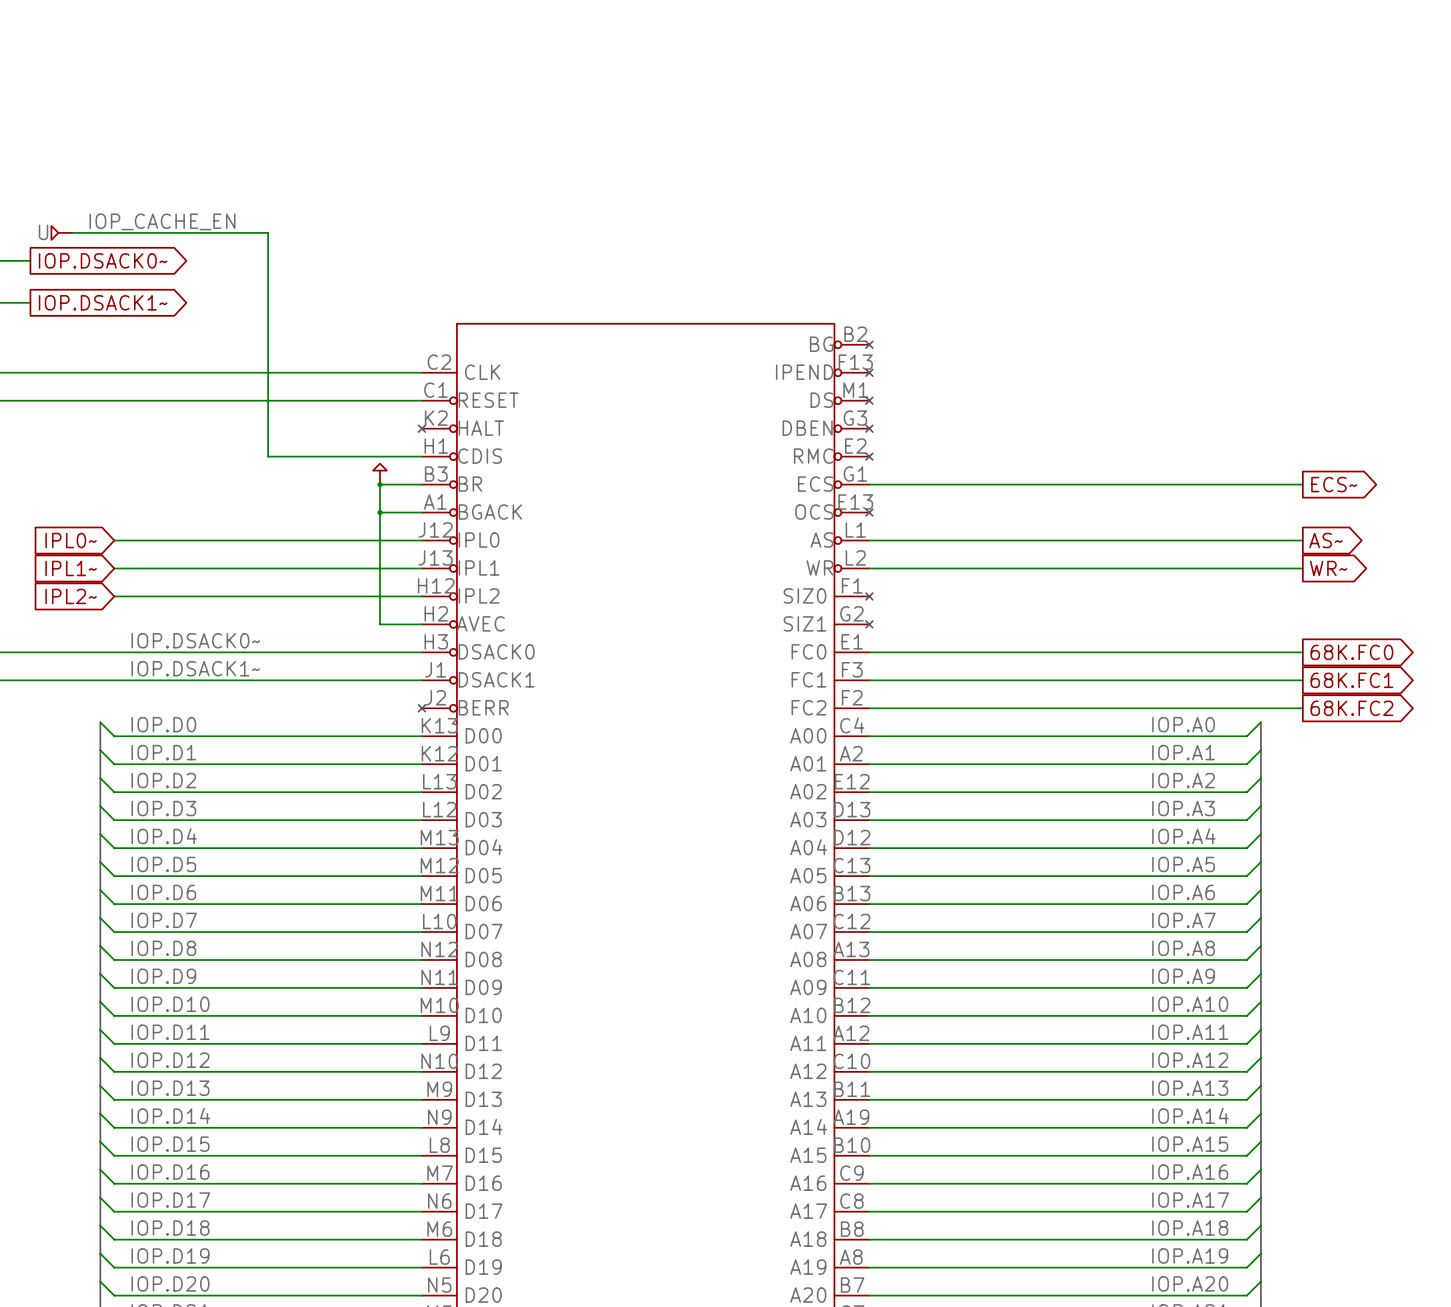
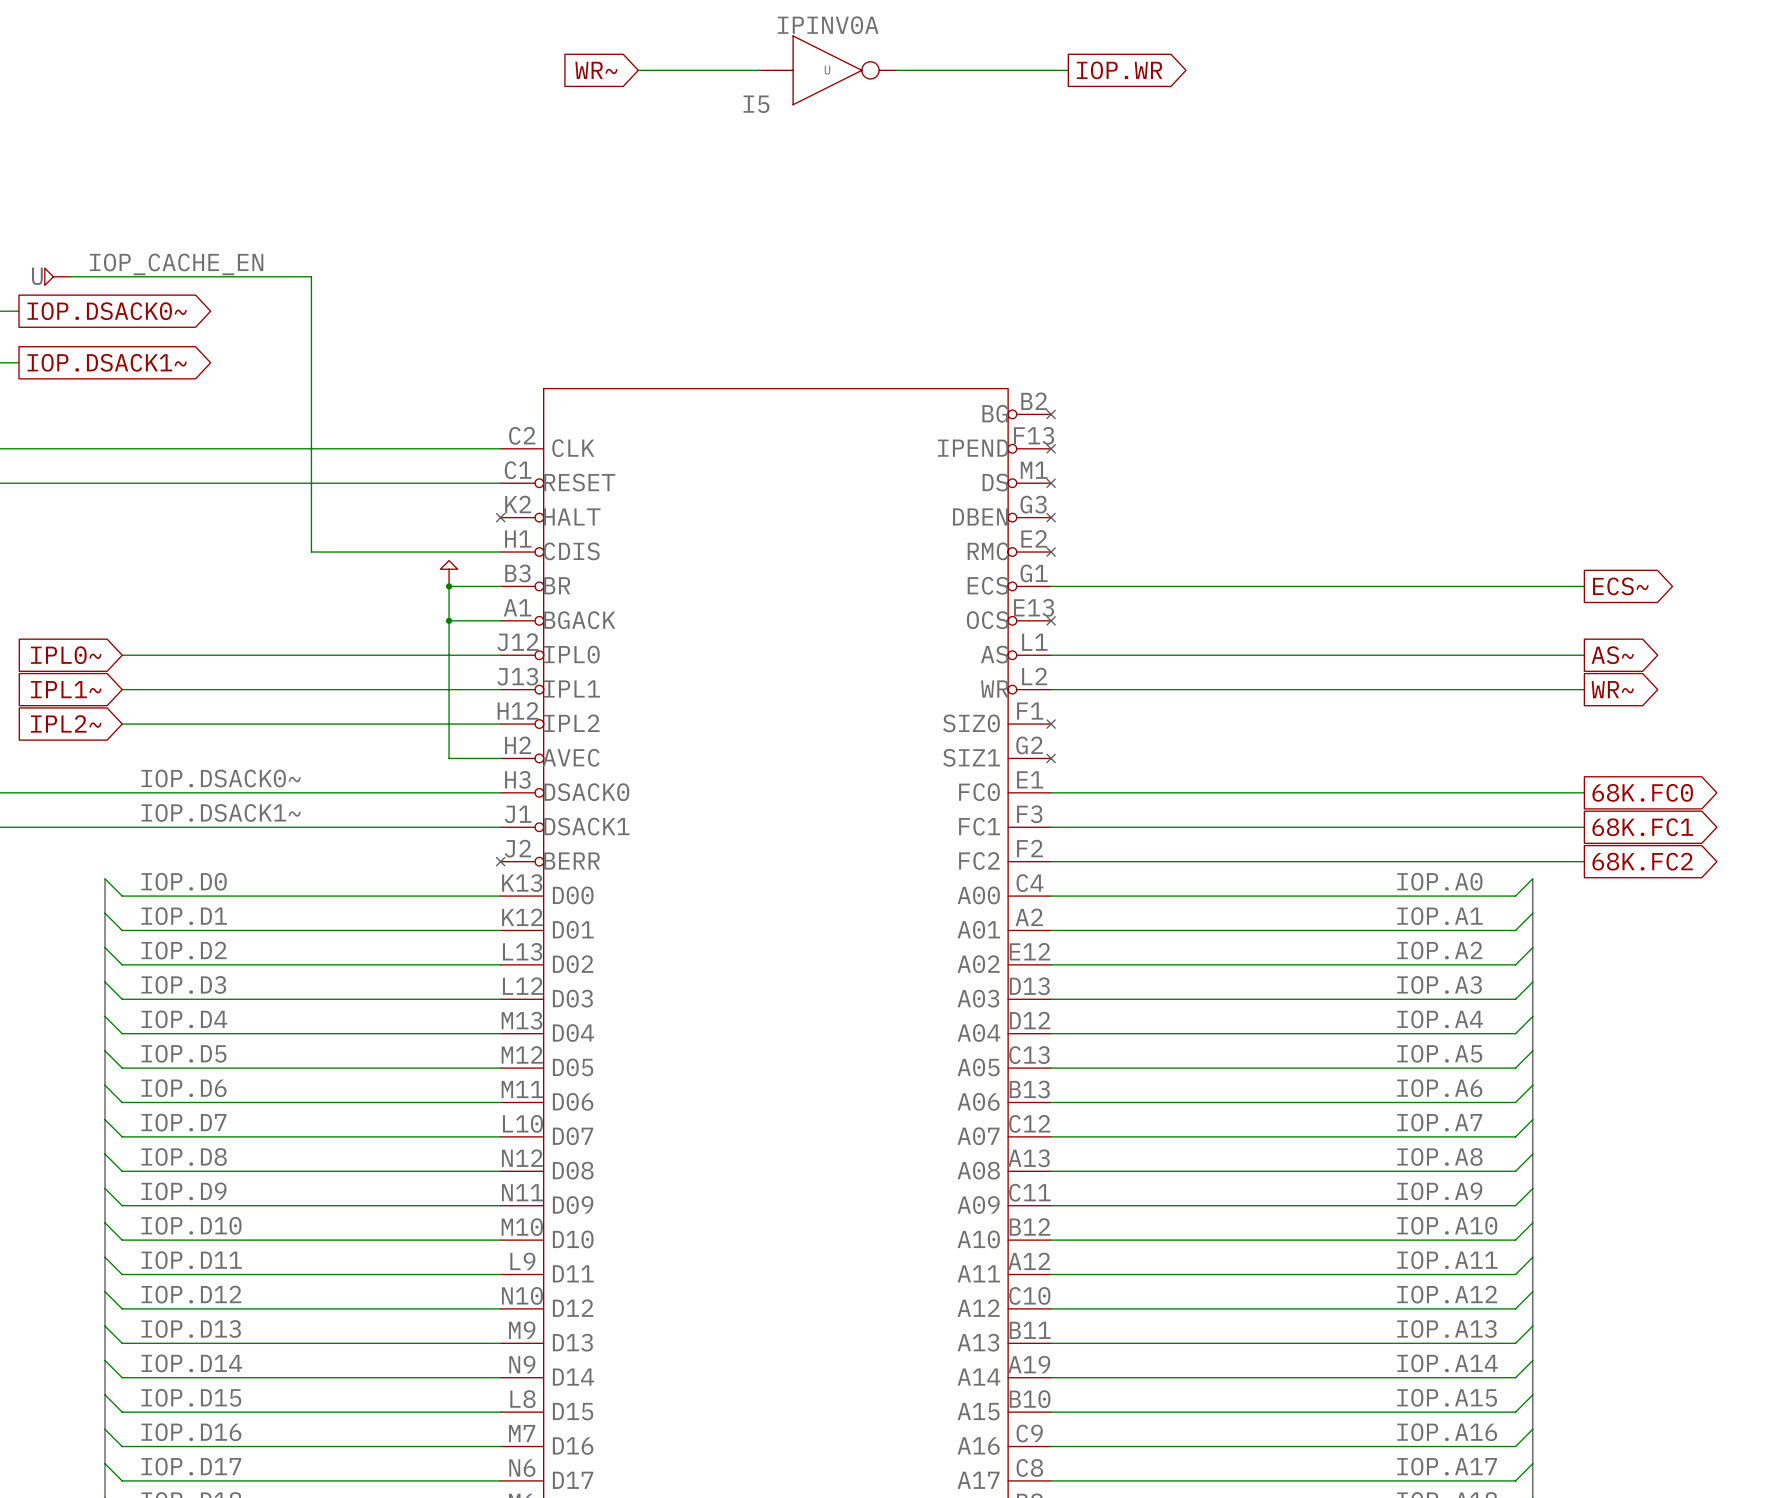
global label: none -> WR~ (596, 70)
wire: none -> (638, 70) (758, 70)
U: none -> (827, 70)
wire: none -> (896, 70) (1068, 70)
global label: none -> IOP.WR (1119, 70)

